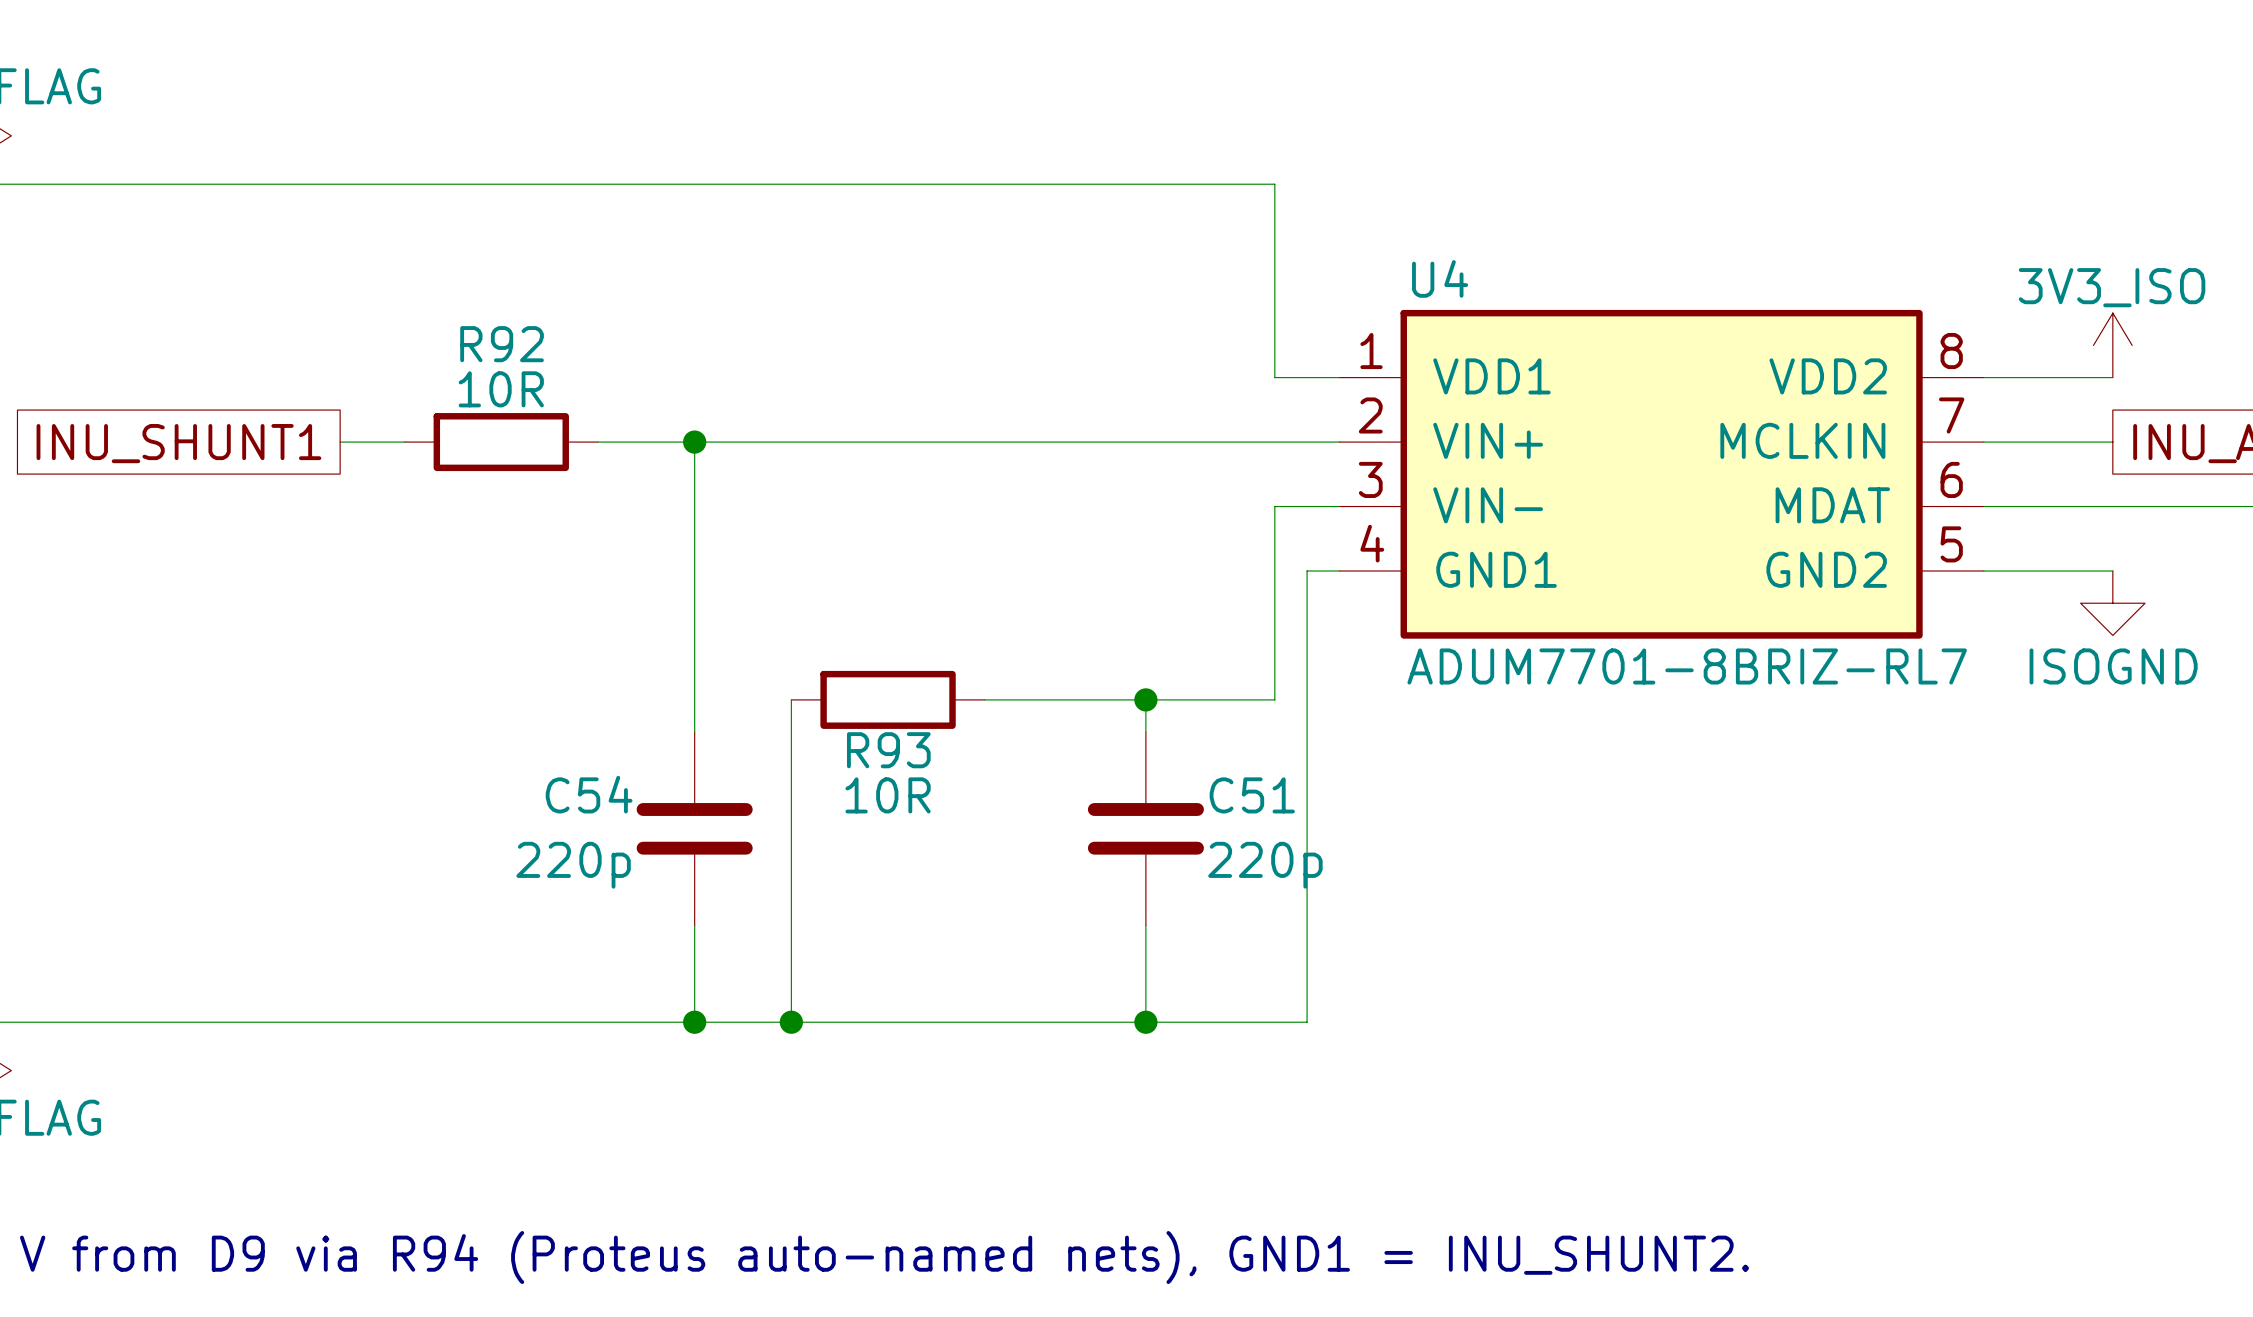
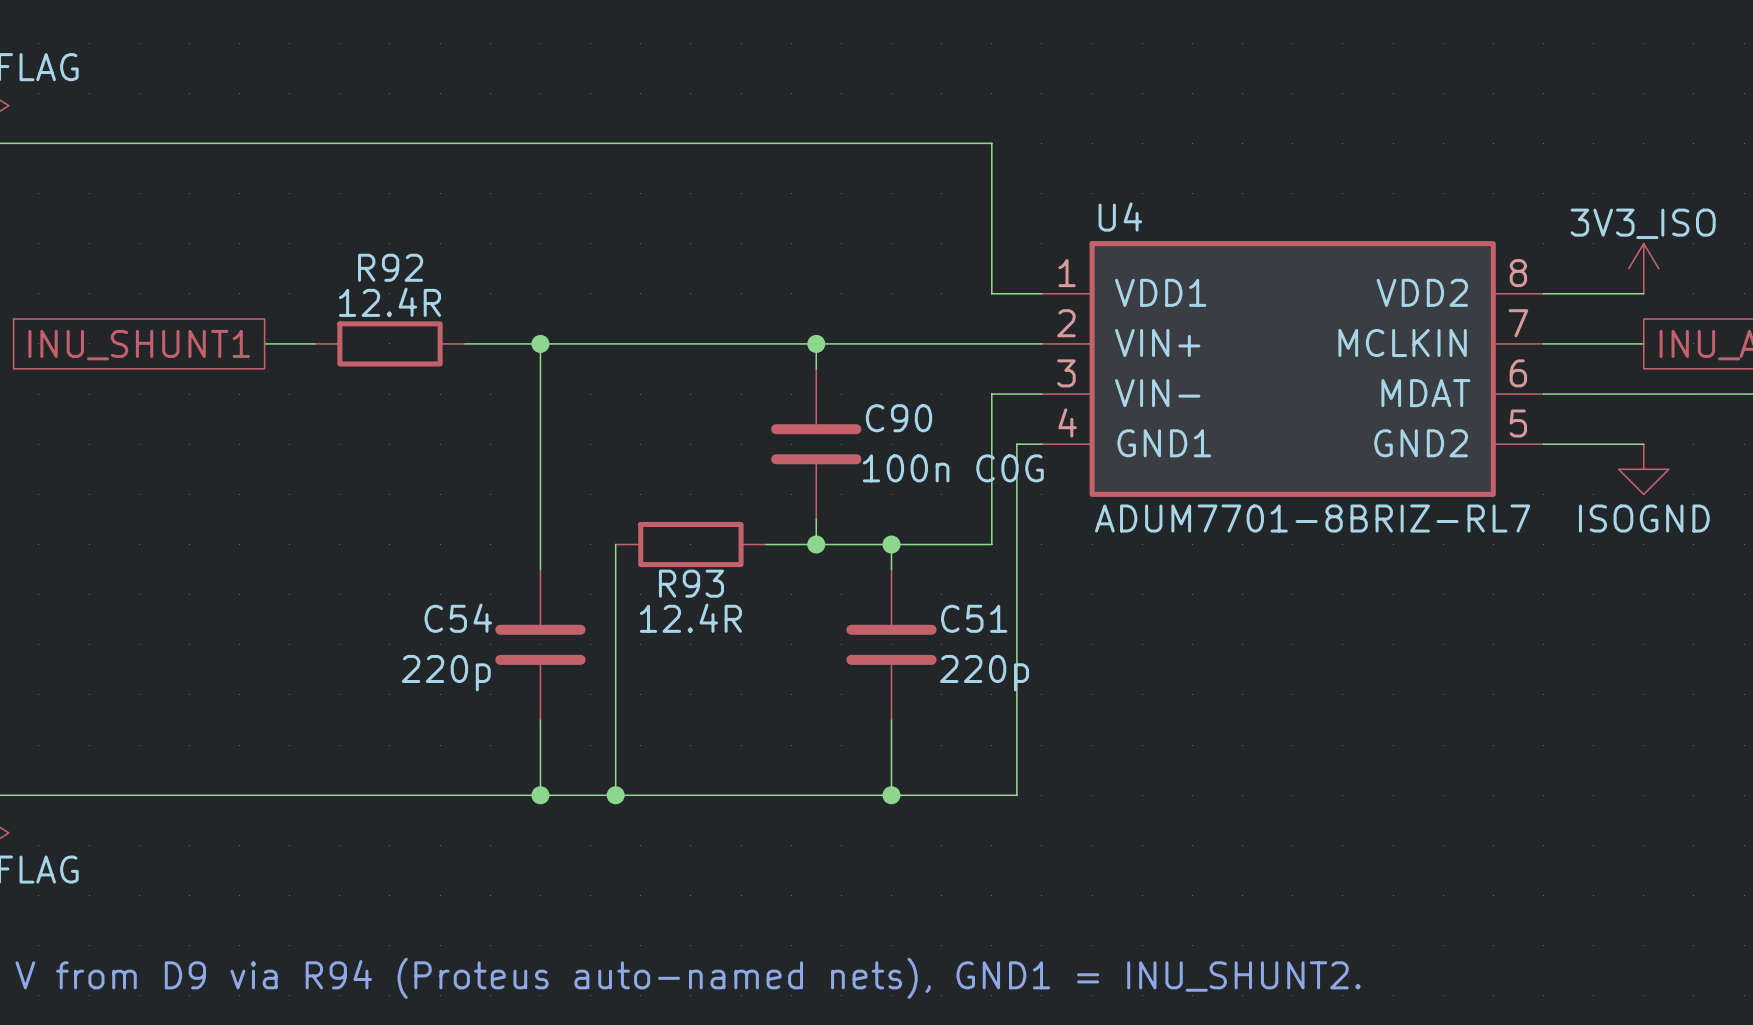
R92 value: 10R (501, 389) -> 12.4R (389, 302)
wire: none -> (816, 343) (816, 368)
junction: none -> (816, 343)
C90: none -> 100n C0G (816, 444)
wire: none -> (816, 519) (816, 544)
junction: none -> (816, 544)
R93 value: 10R (888, 795) -> 12.4R (690, 618)

